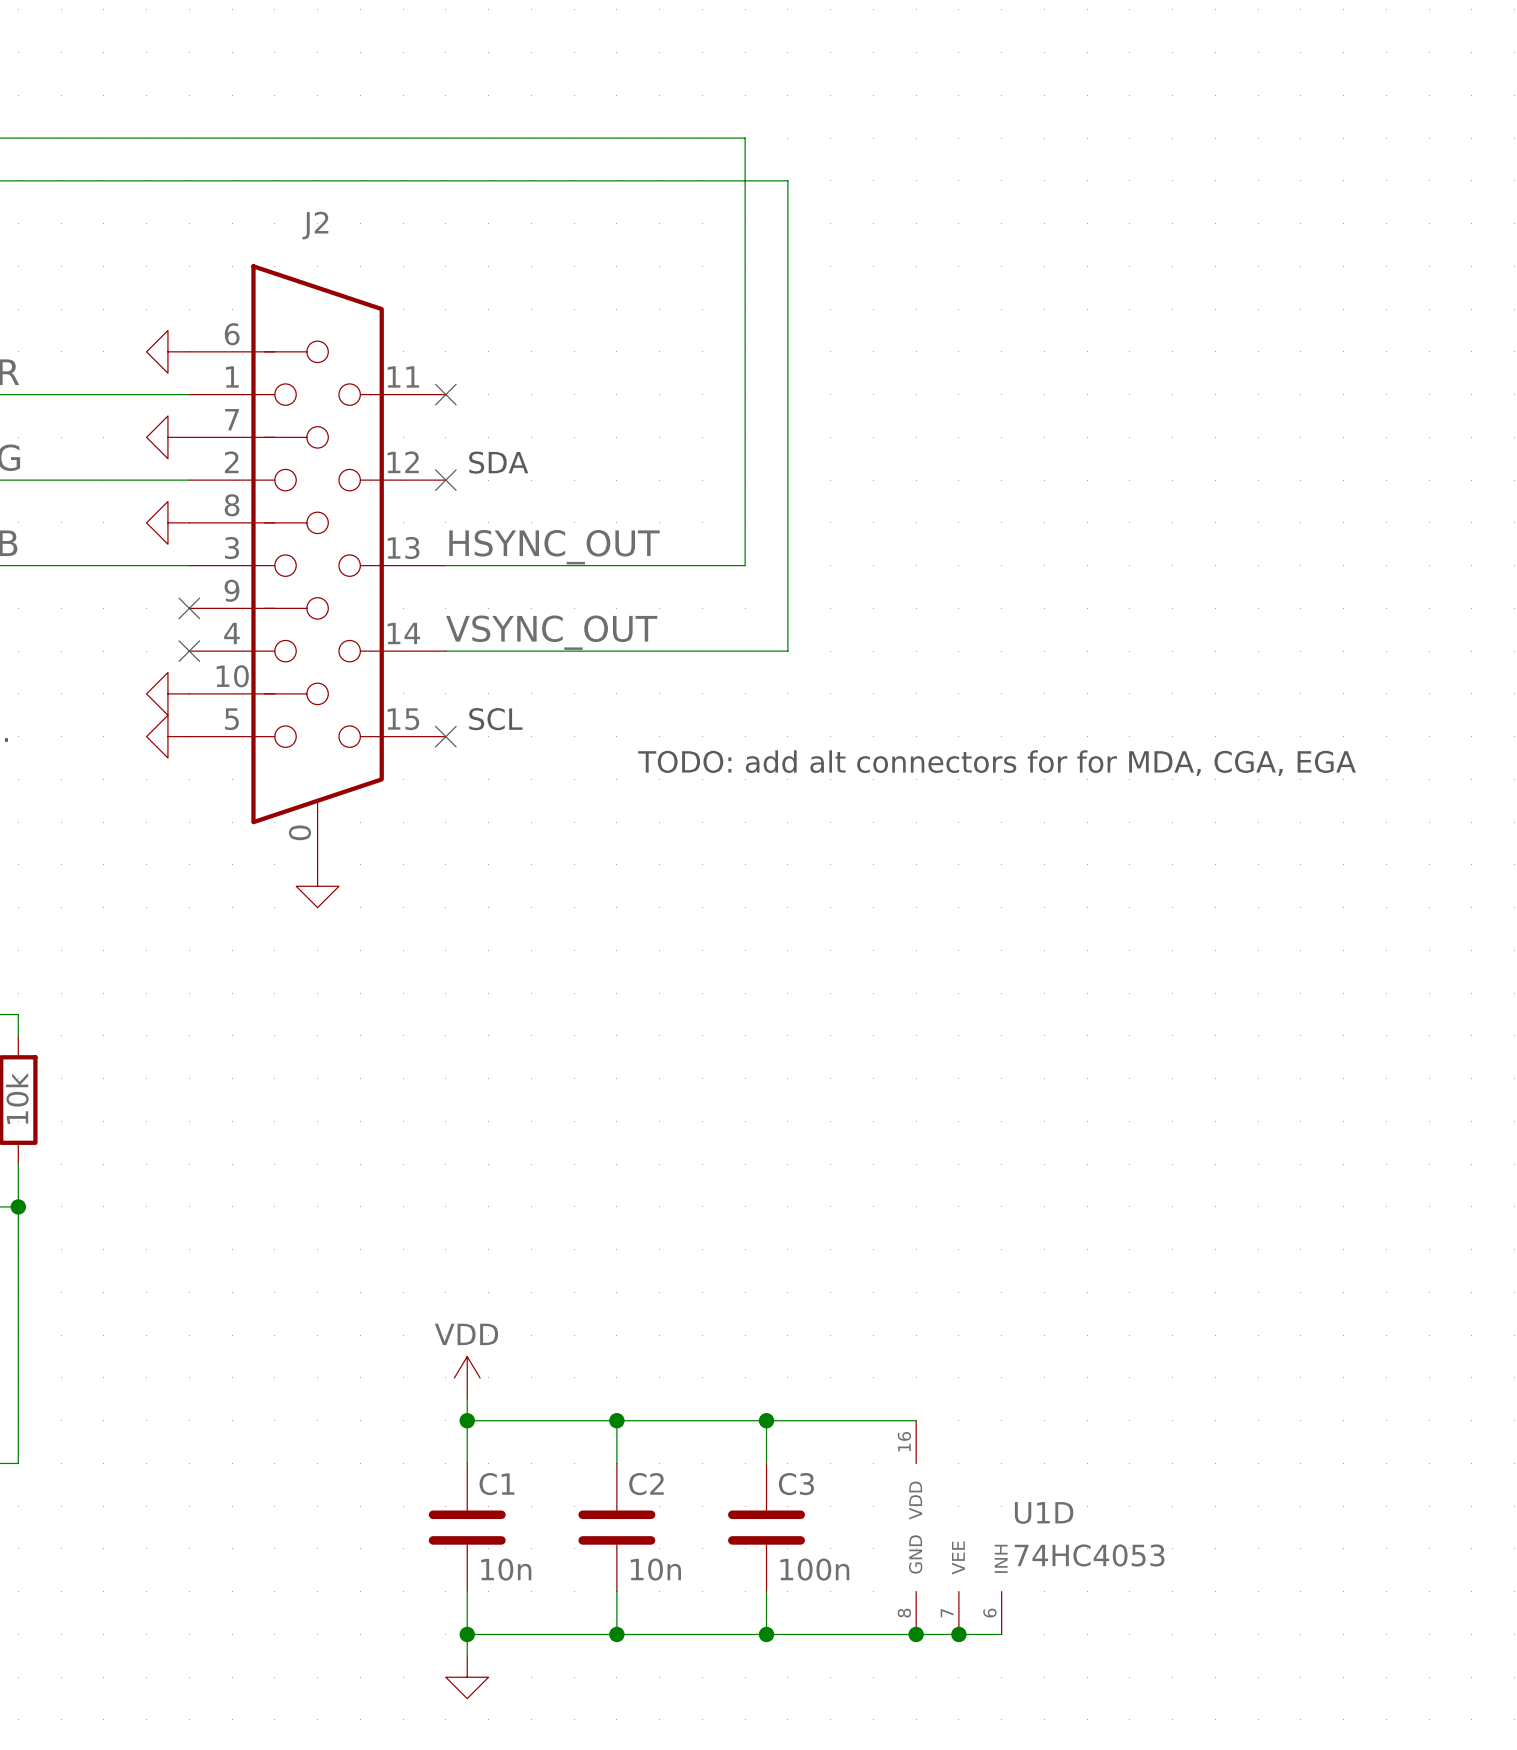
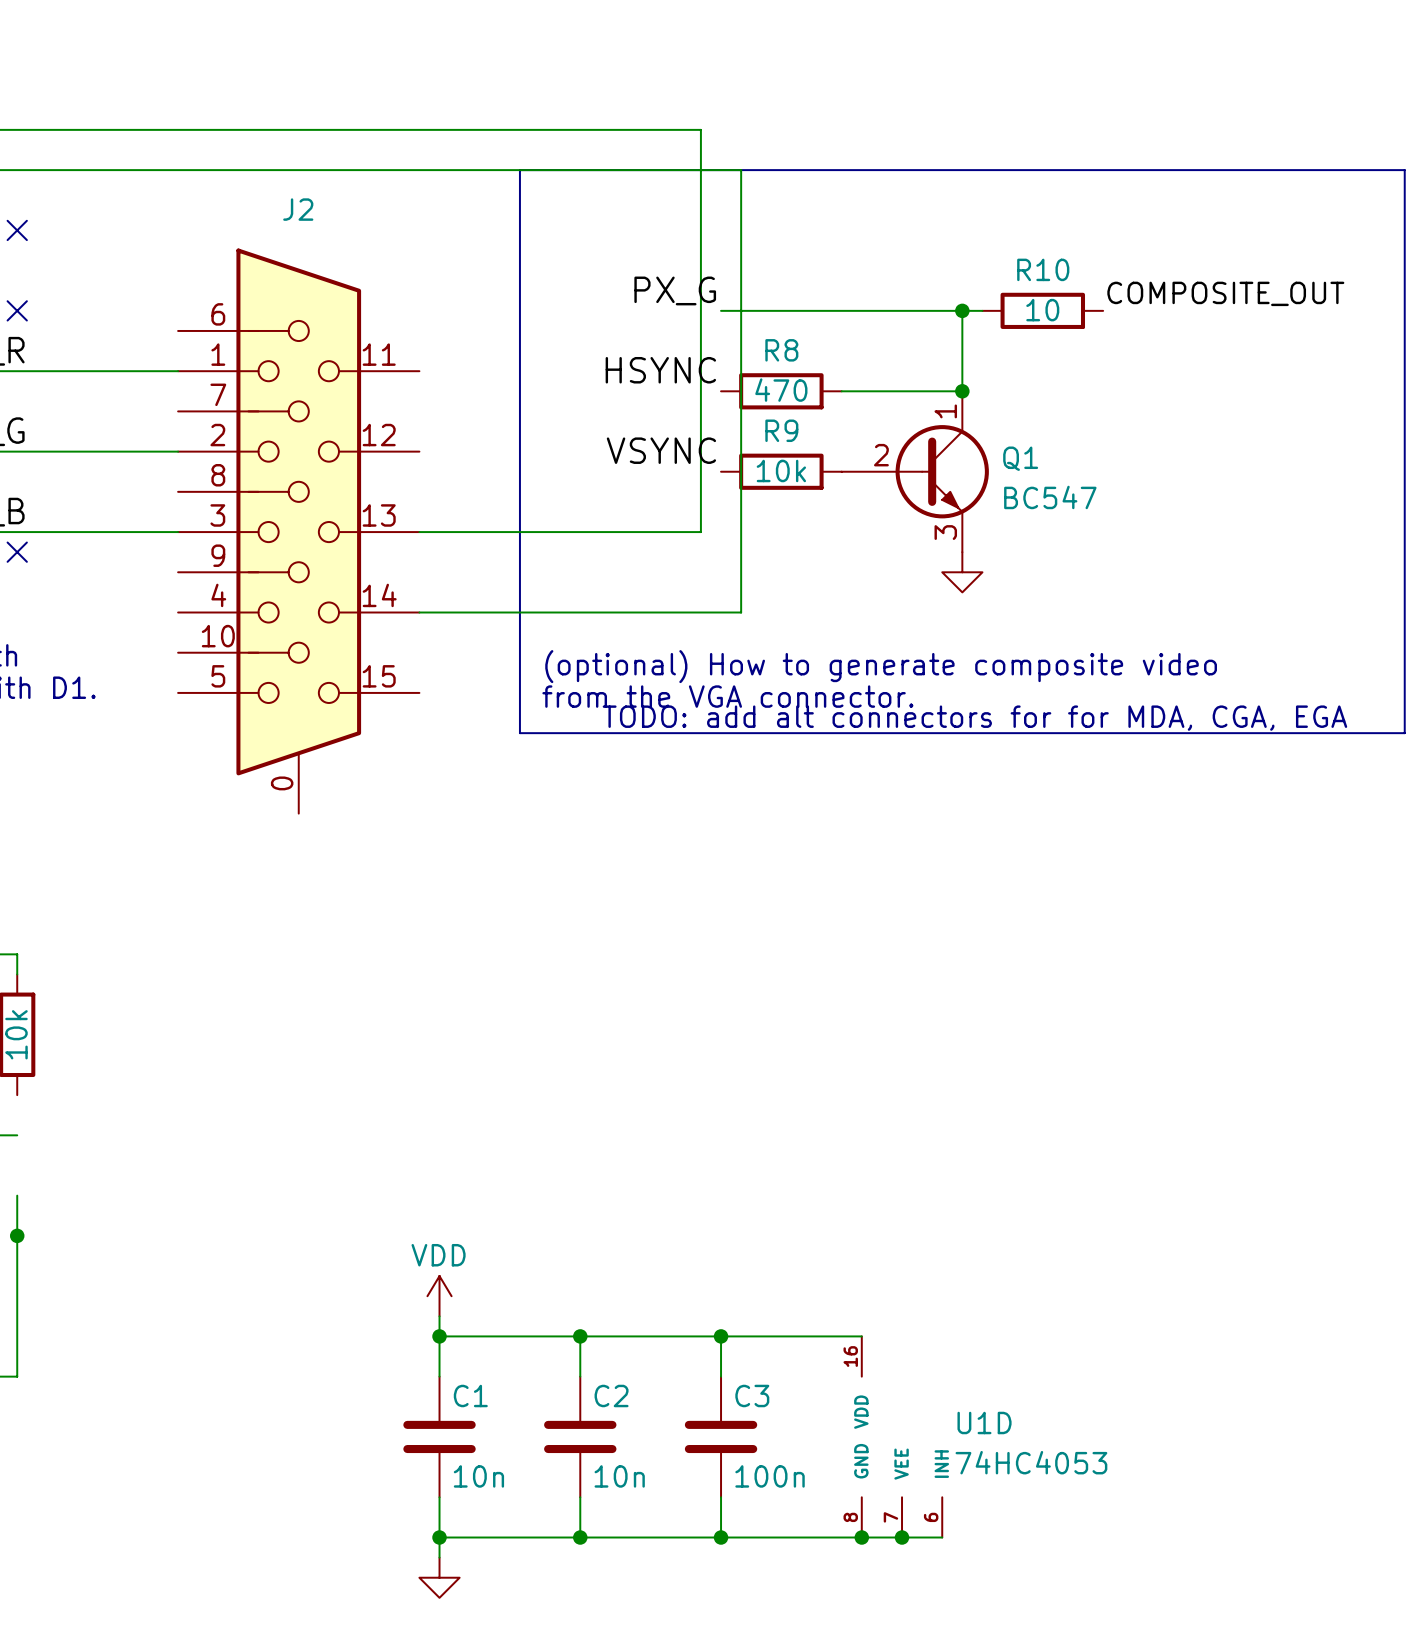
line: none -> (519, 170) (519, 733) (1404, 733) (1404, 170) (519, 170)
no-connect mark: none -> (17, 230)
label: none -> PX_G (675, 290)
label: none -> COMPOSITE_OUT (1225, 293)
no-connect mark: none -> (17, 310)
wire: none -> (721, 310) (982, 310)
wire: none -> (962, 310) (962, 391) (841, 391)
junction: none -> (962, 310)
R10: none -> 10 (1042, 310)
power symbol: (167, 351) -> none
label: none -> HSYNC (660, 370)
no-connect mark: (445, 394) -> none
R8: none -> 470 (781, 391)
junction: none -> (962, 391)
power symbol: (167, 437) -> none
text: SDA (498, 462) -> none
label: none -> VSYNC (661, 450)
no-connect mark: (445, 480) -> none
R9: none -> 10k (781, 471)
Q1: none -> BC547 (915, 471)
power symbol: (167, 522) -> none
label: HSYNC_OUT (554, 547) -> none
no-connect mark: none -> (17, 552)
no-connect mark: (189, 608) -> none
power symbol: none -> (962, 572)
label: VSYNC_OUT (551, 632) -> none
no-connect mark: (189, 651) -> none
power symbol: (167, 693) -> none
text: none -> (optional) How to generate composite video (881, 666)
text: SCL (495, 719) -> none
power symbol: (167, 736) -> none
no-connect mark: (445, 736) -> none
text: none -> from the VGA connector. (727, 696)
power symbol: (317, 886) -> none
wire: (18, 1164) (18, 1271) -> none
junction: (18, 1206) -> none
junction: none -> (17, 1235)

